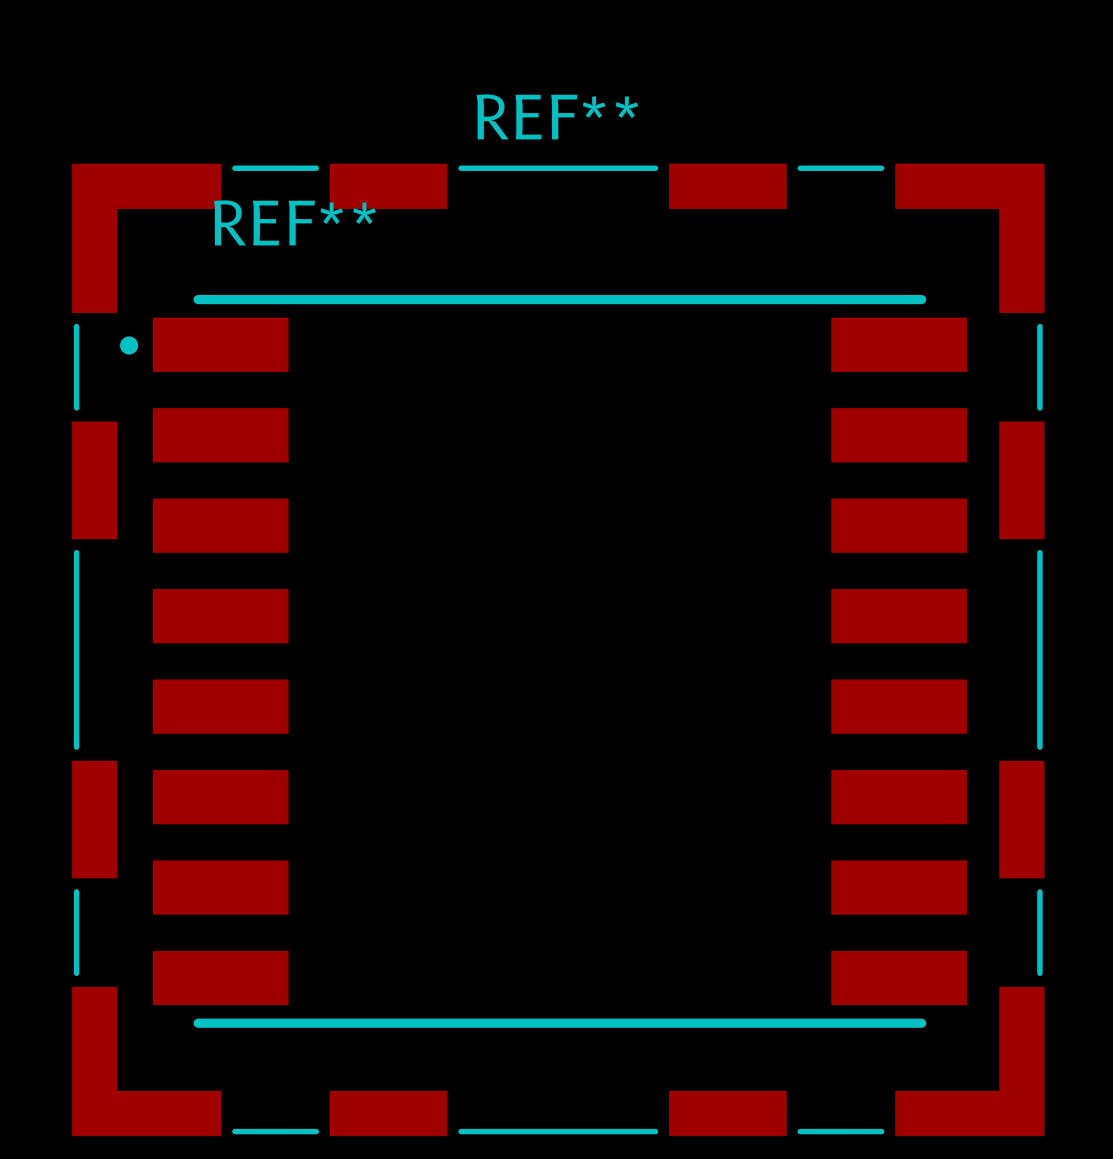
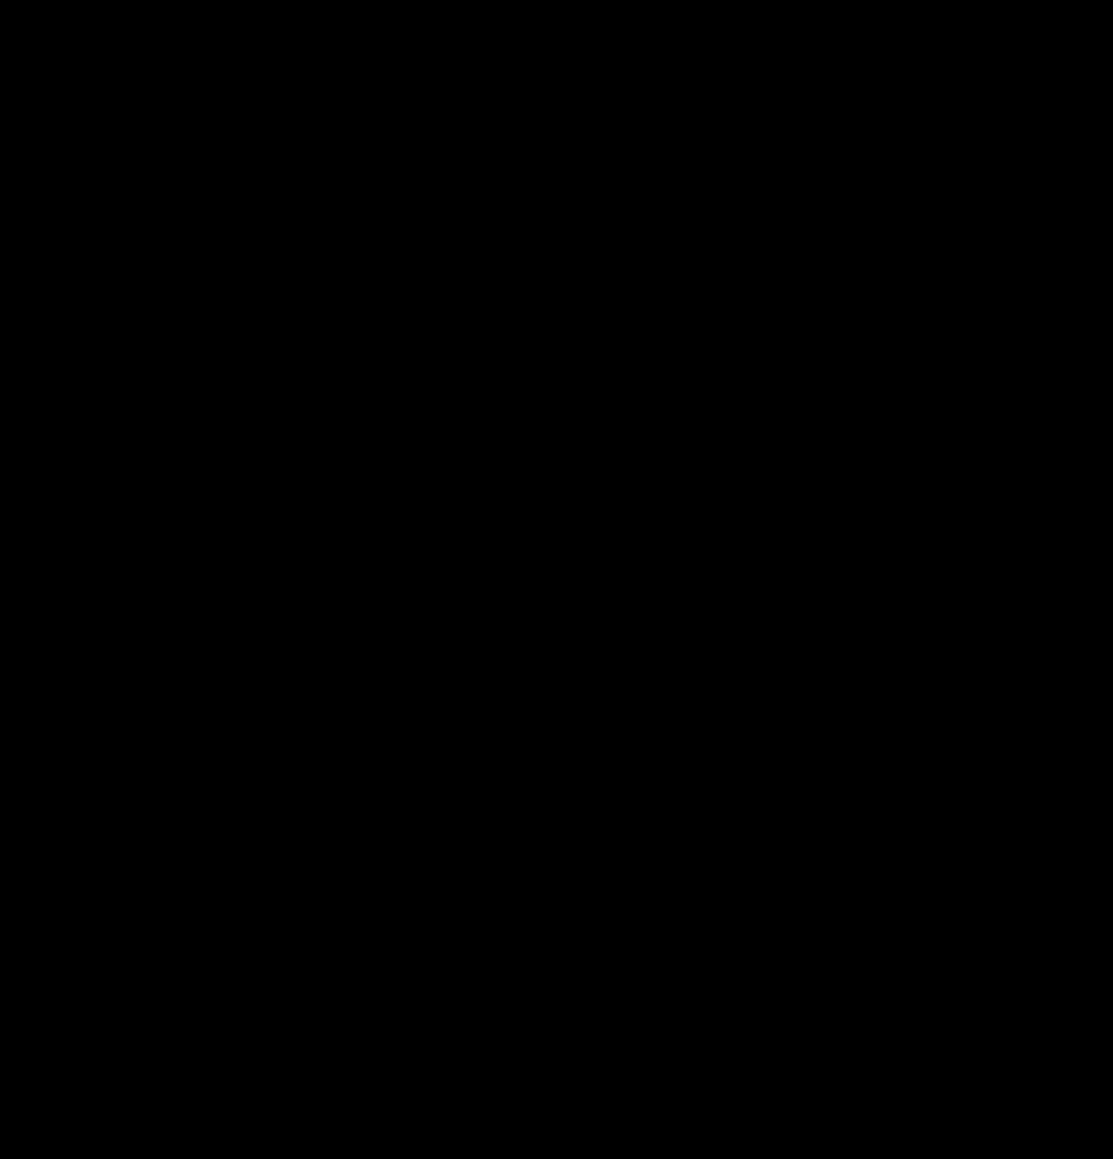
REF**: (558, 649) -> none
REF**: (543, 661) -> none

